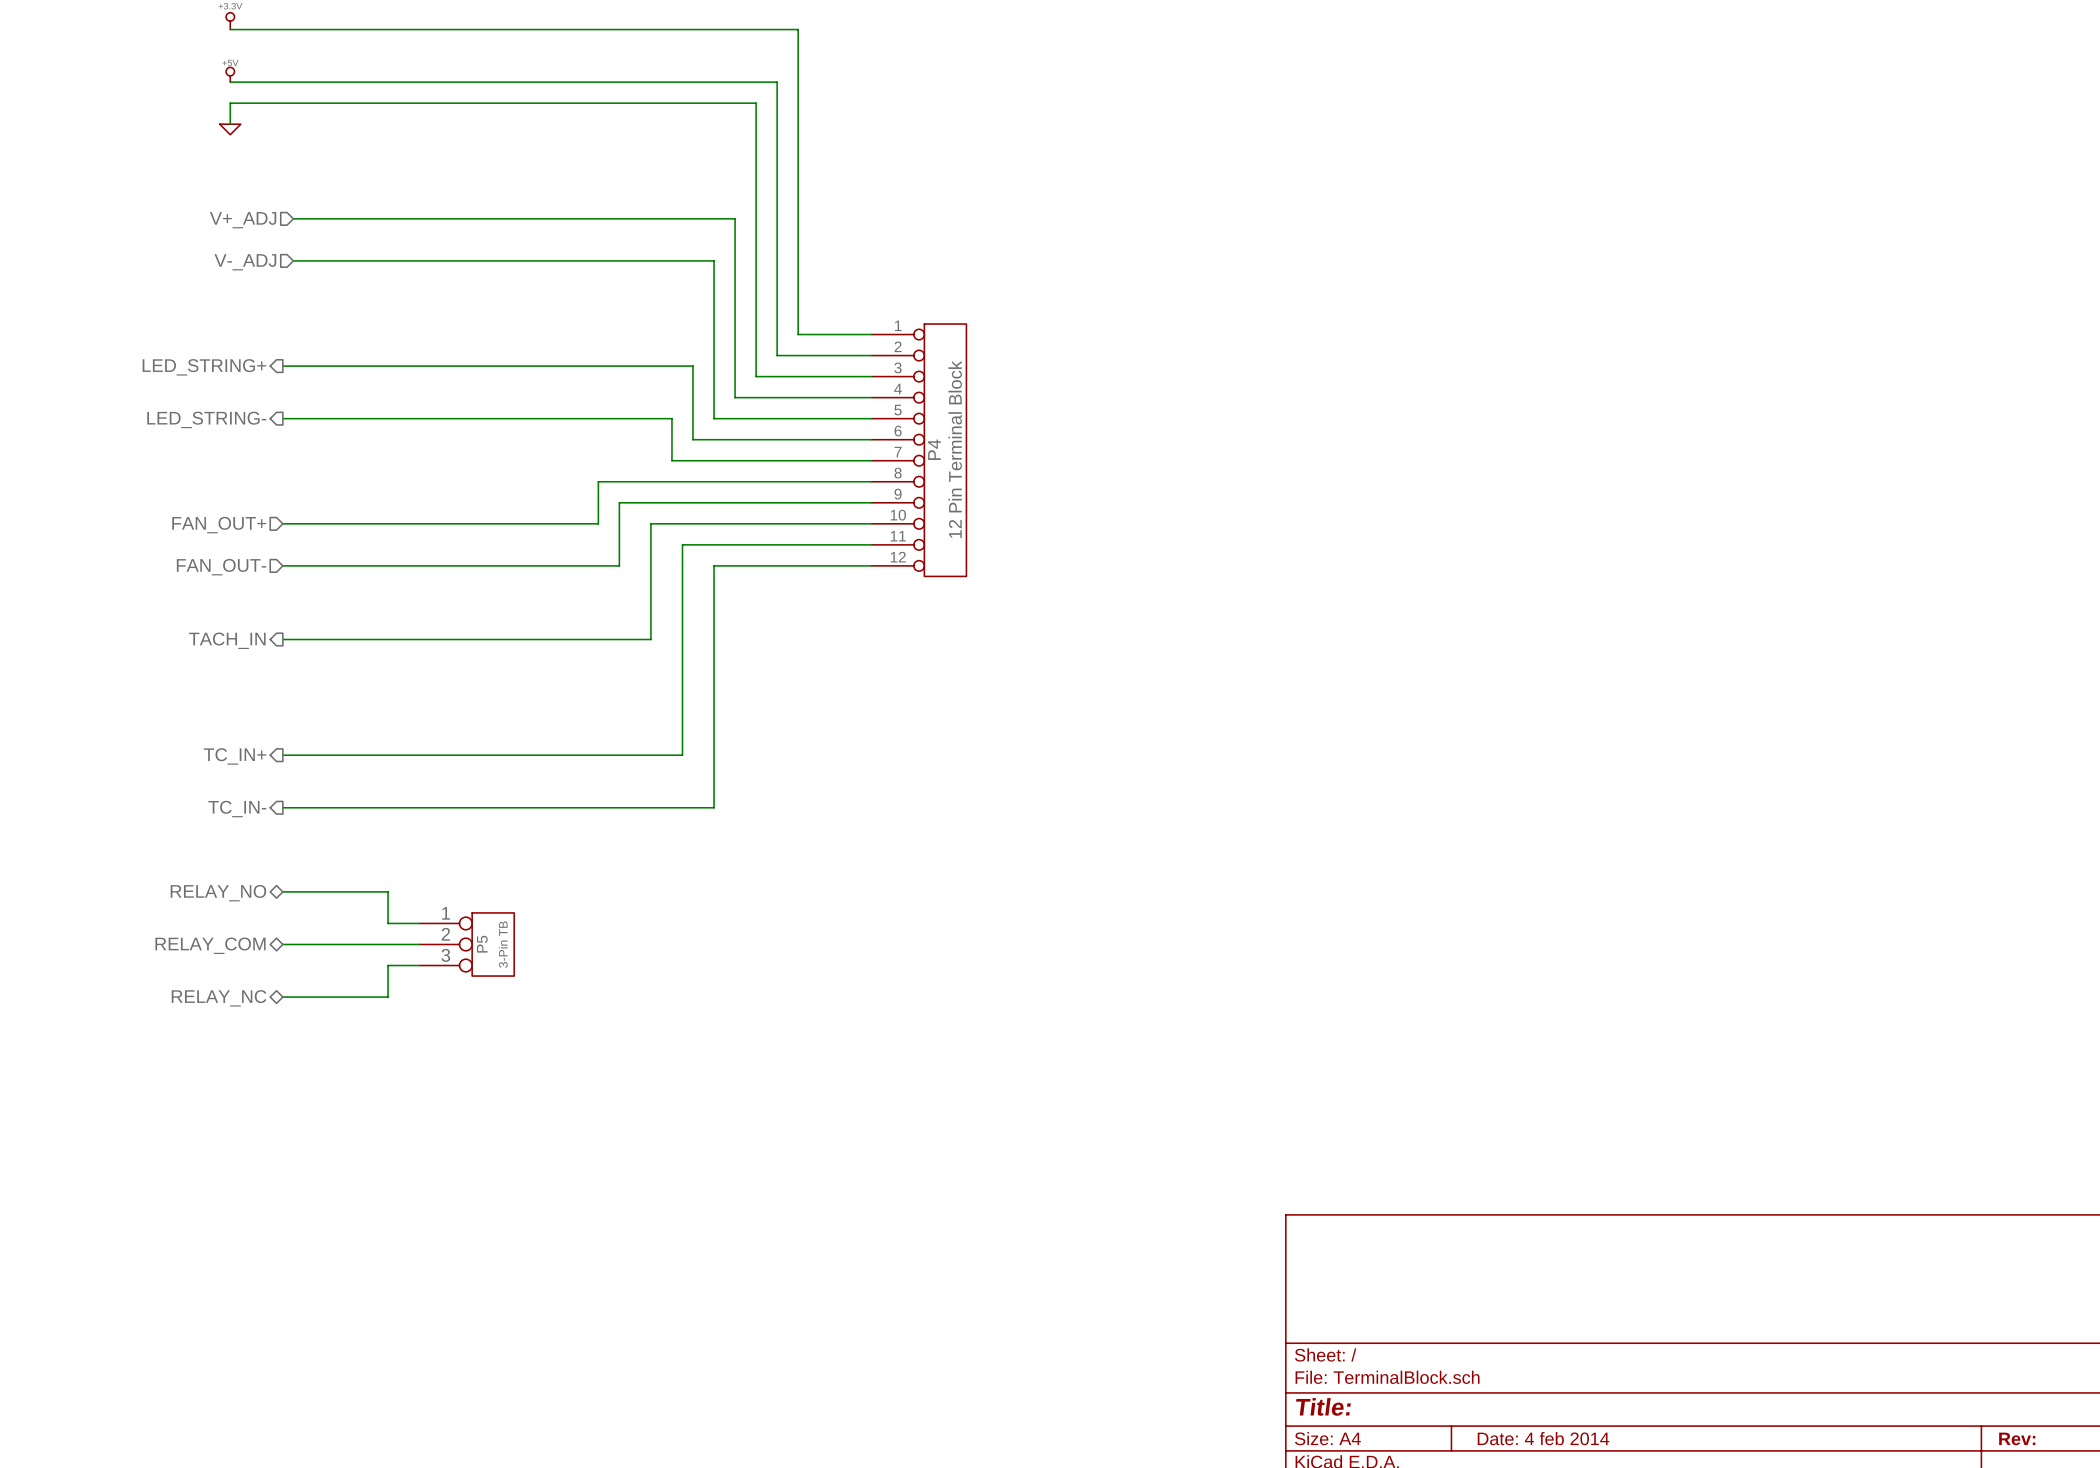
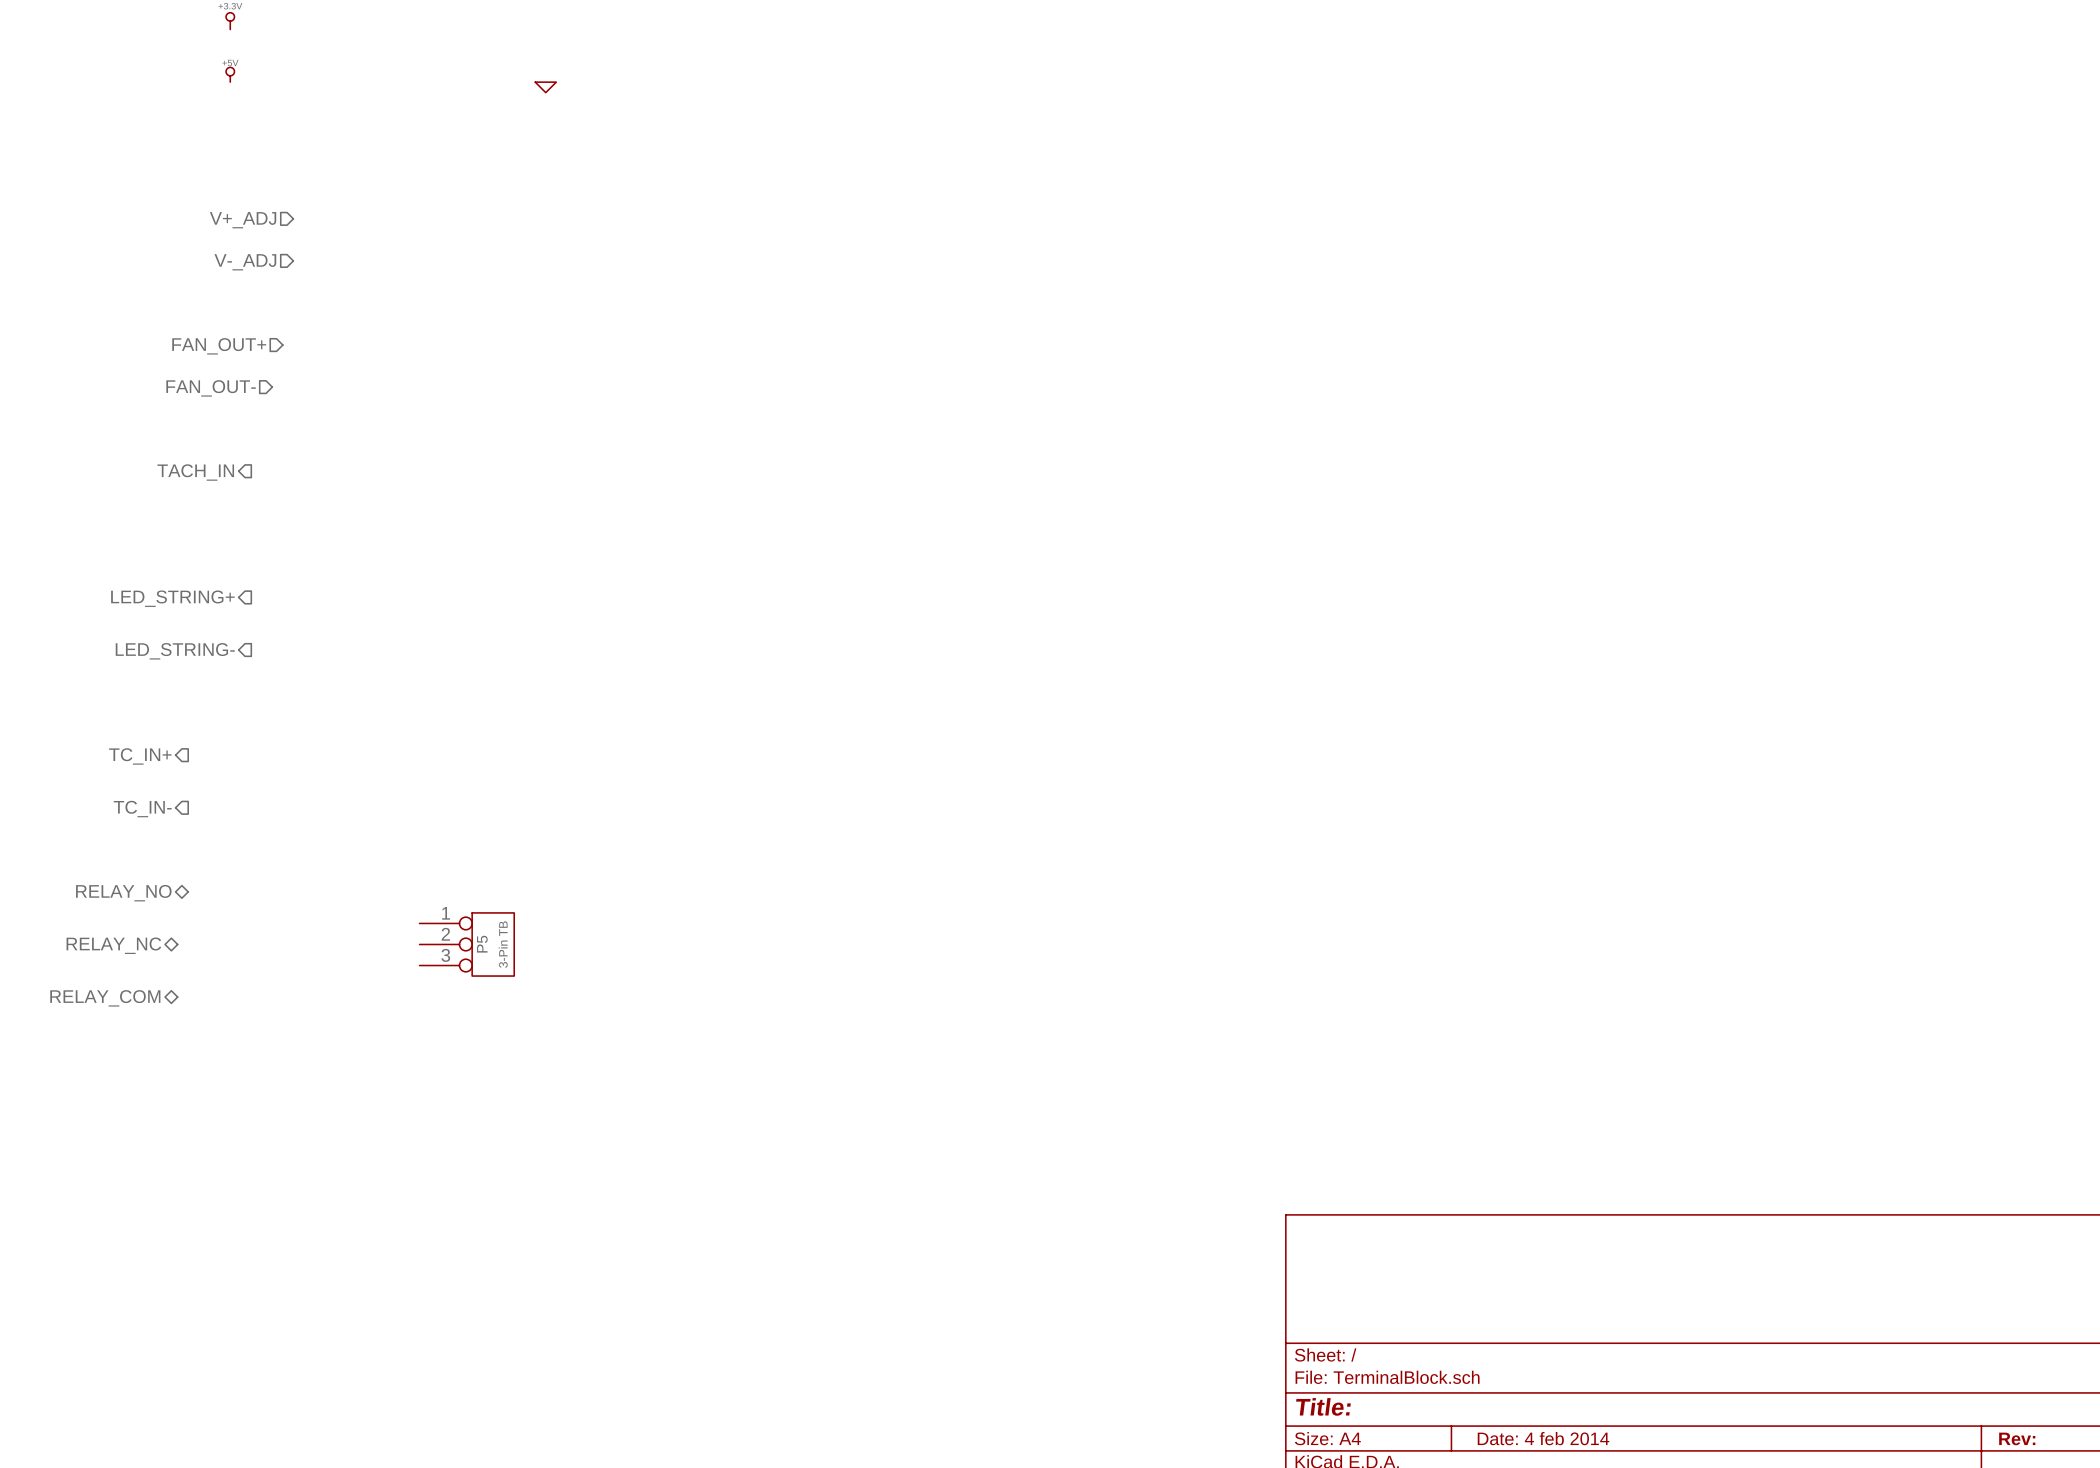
wire: (230, 29) (798, 29) (798, 334) (871, 334) -> none
wire: (230, 82) (777, 82) (777, 355) (871, 355) -> none
power symbol: none -> (545, 87)
wire: (230, 124) (230, 103) (756, 103) (756, 376) (871, 376) -> none
power symbol: (230, 129) -> none
wire: (293, 218) (735, 218) (735, 397) (871, 397) -> none
wire: (293, 260) (714, 260) (714, 418) (871, 418) -> none
wire: (282, 366) (692, 366) (692, 439) (871, 439) -> none
hierarchical label: LED_STRING+ (204, 367) -> none
wire: (282, 418) (671, 418) (671, 460) (871, 460) -> none
hierarchical label: LED_STRING- (206, 419) -> none
P4: 12 Pin Terminal Block (919, 450) -> none
wire: (871, 481) (598, 481) (598, 523) (282, 523) -> none
wire: (871, 502) (619, 502) (619, 565) (282, 565) -> none
wire: (871, 523) (650, 523) (650, 639) (282, 639) -> none
hierarchical label position: FAN_OUT+ (219, 525) -> FAN_OUT+ (219, 346)
wire: (871, 544) (682, 544) (682, 755) (282, 755) -> none
wire: (871, 565) (714, 565) (714, 807) (282, 807) -> none
hierarchical label position: FAN_OUT- (221, 567) -> FAN_OUT- (211, 388)
hierarchical label: none -> LED_STRING+ (172, 598)
hierarchical label position: TACH_IN (227, 640) -> TACH_IN (195, 472)
hierarchical label: none -> LED_STRING- (175, 651)
hierarchical label position: TC_IN+ (234, 756) -> TC_IN+ (140, 756)
hierarchical label position: TC_IN- (237, 809) -> TC_IN- (142, 809)
wire: (282, 891) (388, 891) (388, 923) (419, 923) -> none
hierarchical label position: RELAY_NO (218, 893) -> RELAY_NO (123, 893)
wire: (282, 944) (419, 944) -> none
hierarchical label position: RELAY_COM (210, 945) -> RELAY_COM (105, 998)
wire: (419, 965) (388, 965) (388, 997) (282, 997) -> none
hierarchical label position: RELAY_NC (219, 998) -> RELAY_NC (113, 945)

